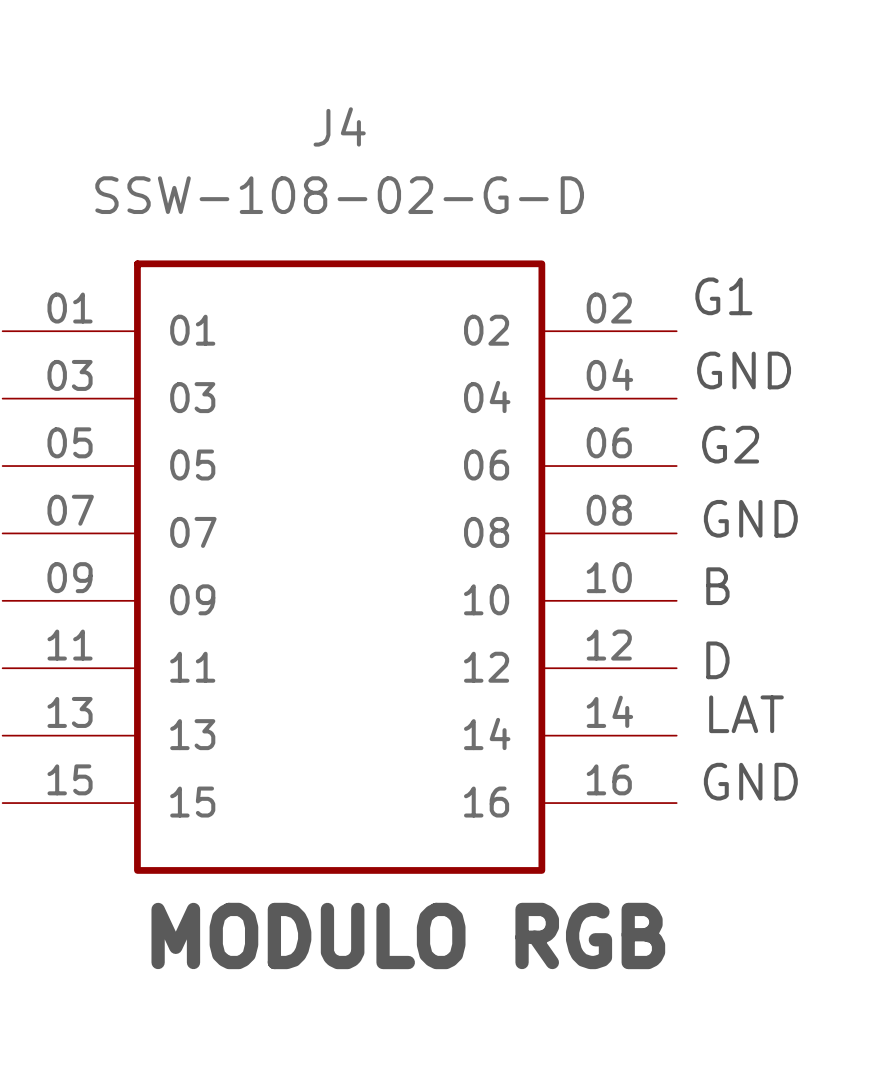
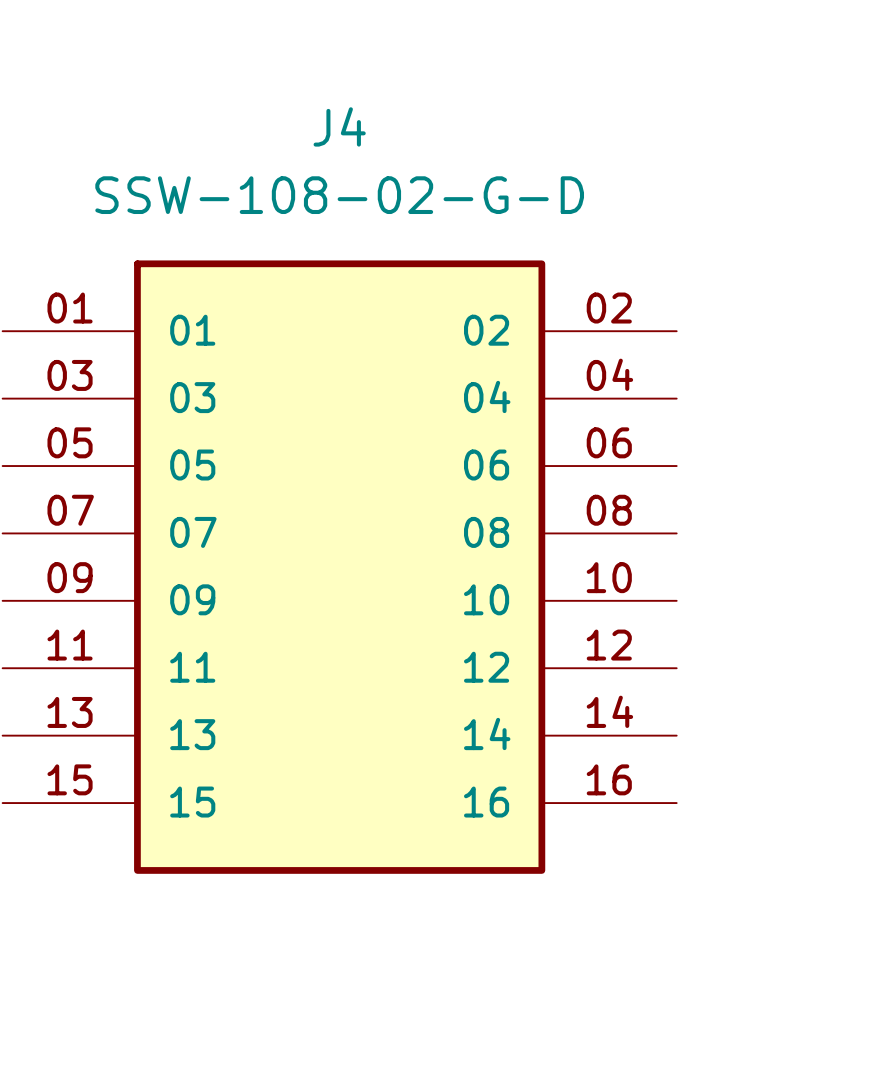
text: G1 (723, 296) -> none
text: GND (744, 370) -> none
text: G2 (730, 444) -> none
text: GND (750, 518) -> none
text: B (717, 586) -> none
text: D (717, 660) -> none
text: LAT (746, 714) -> none
text: GND (750, 781) -> none
text: MODULO RGB (408, 935) -> none

